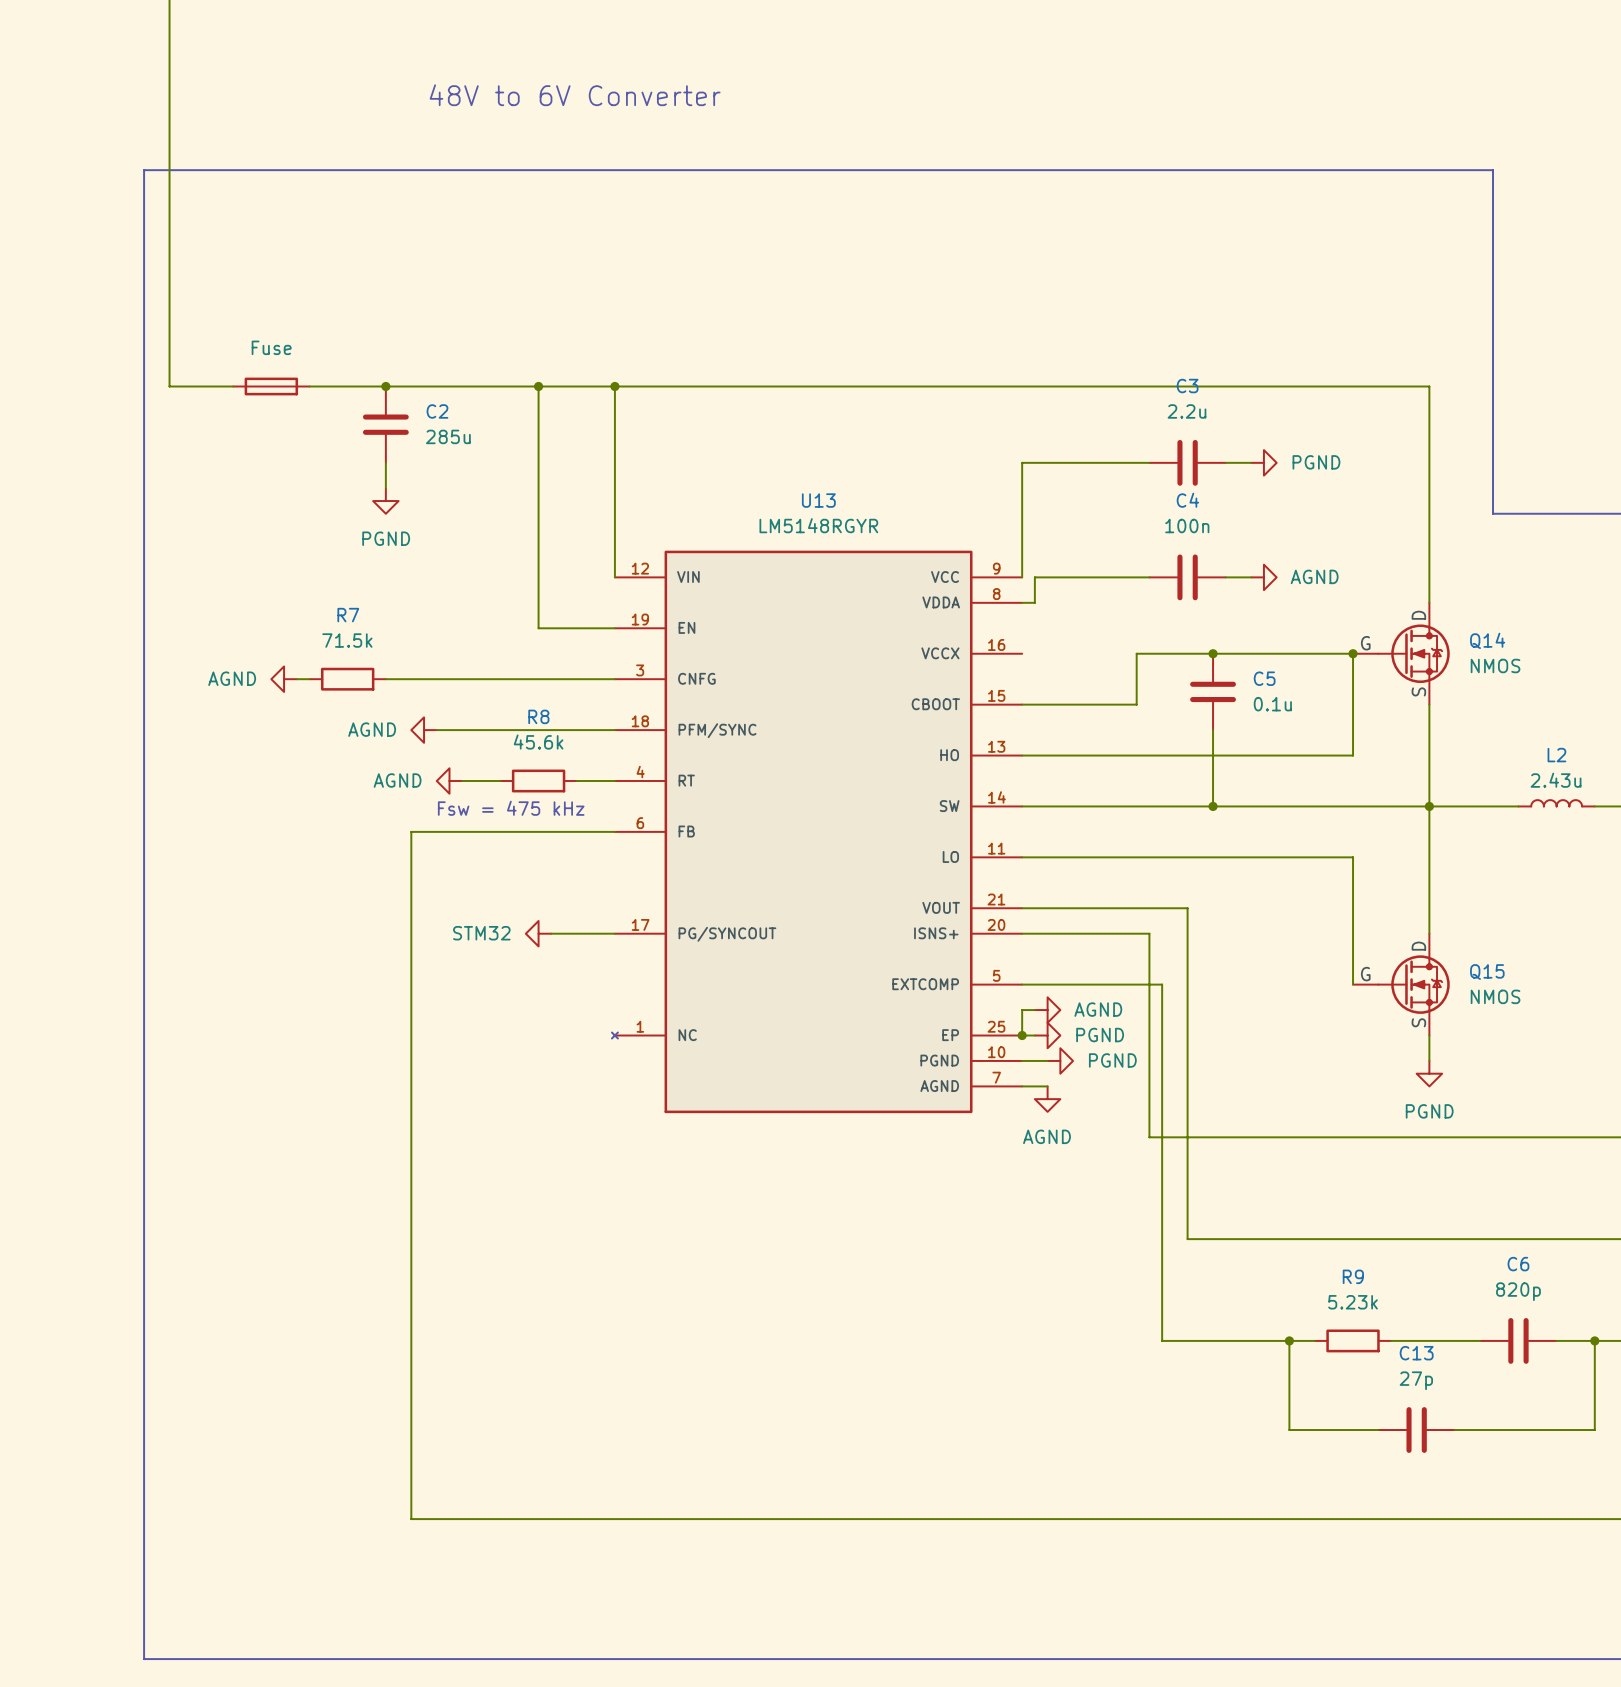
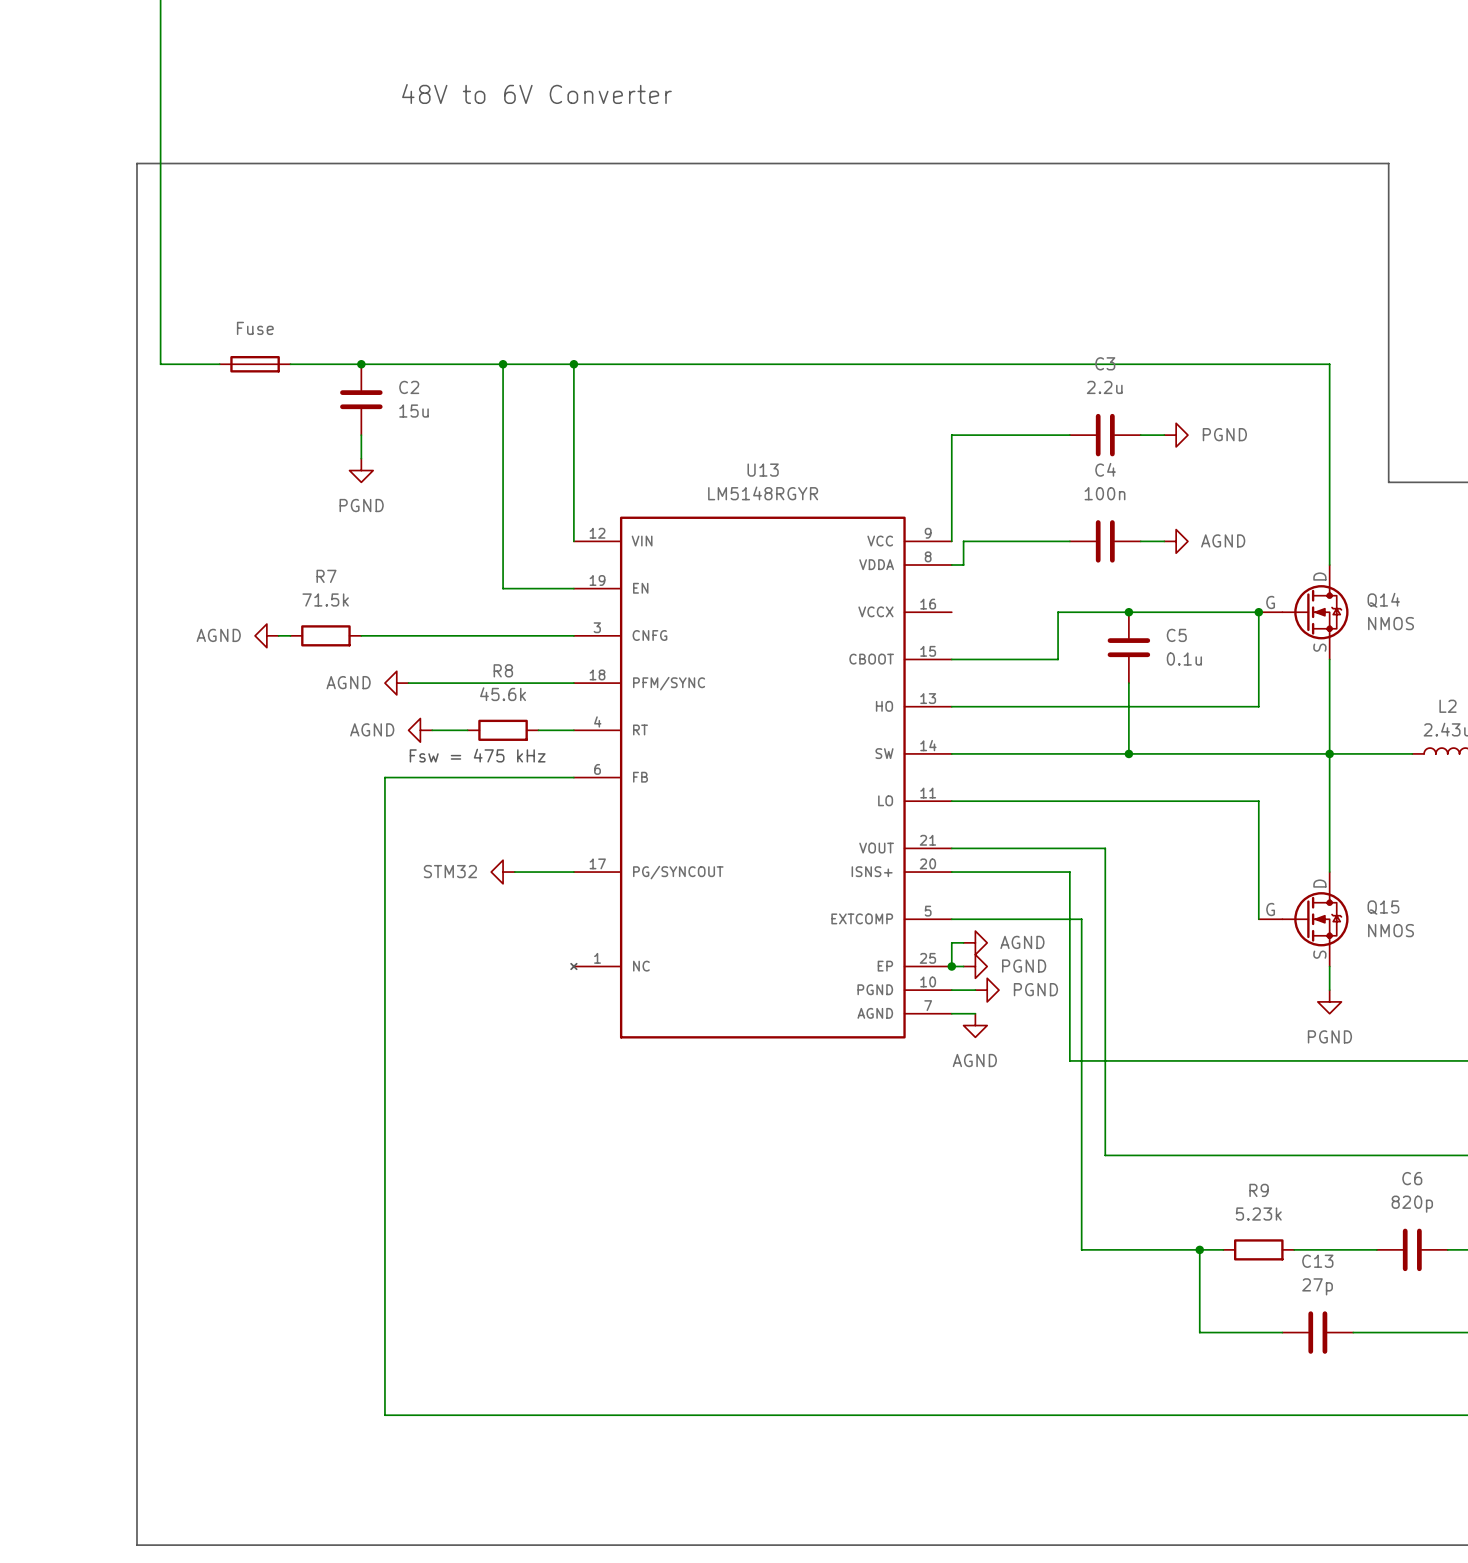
C2 value: 285u (448, 436) -> 15u (414, 411)

